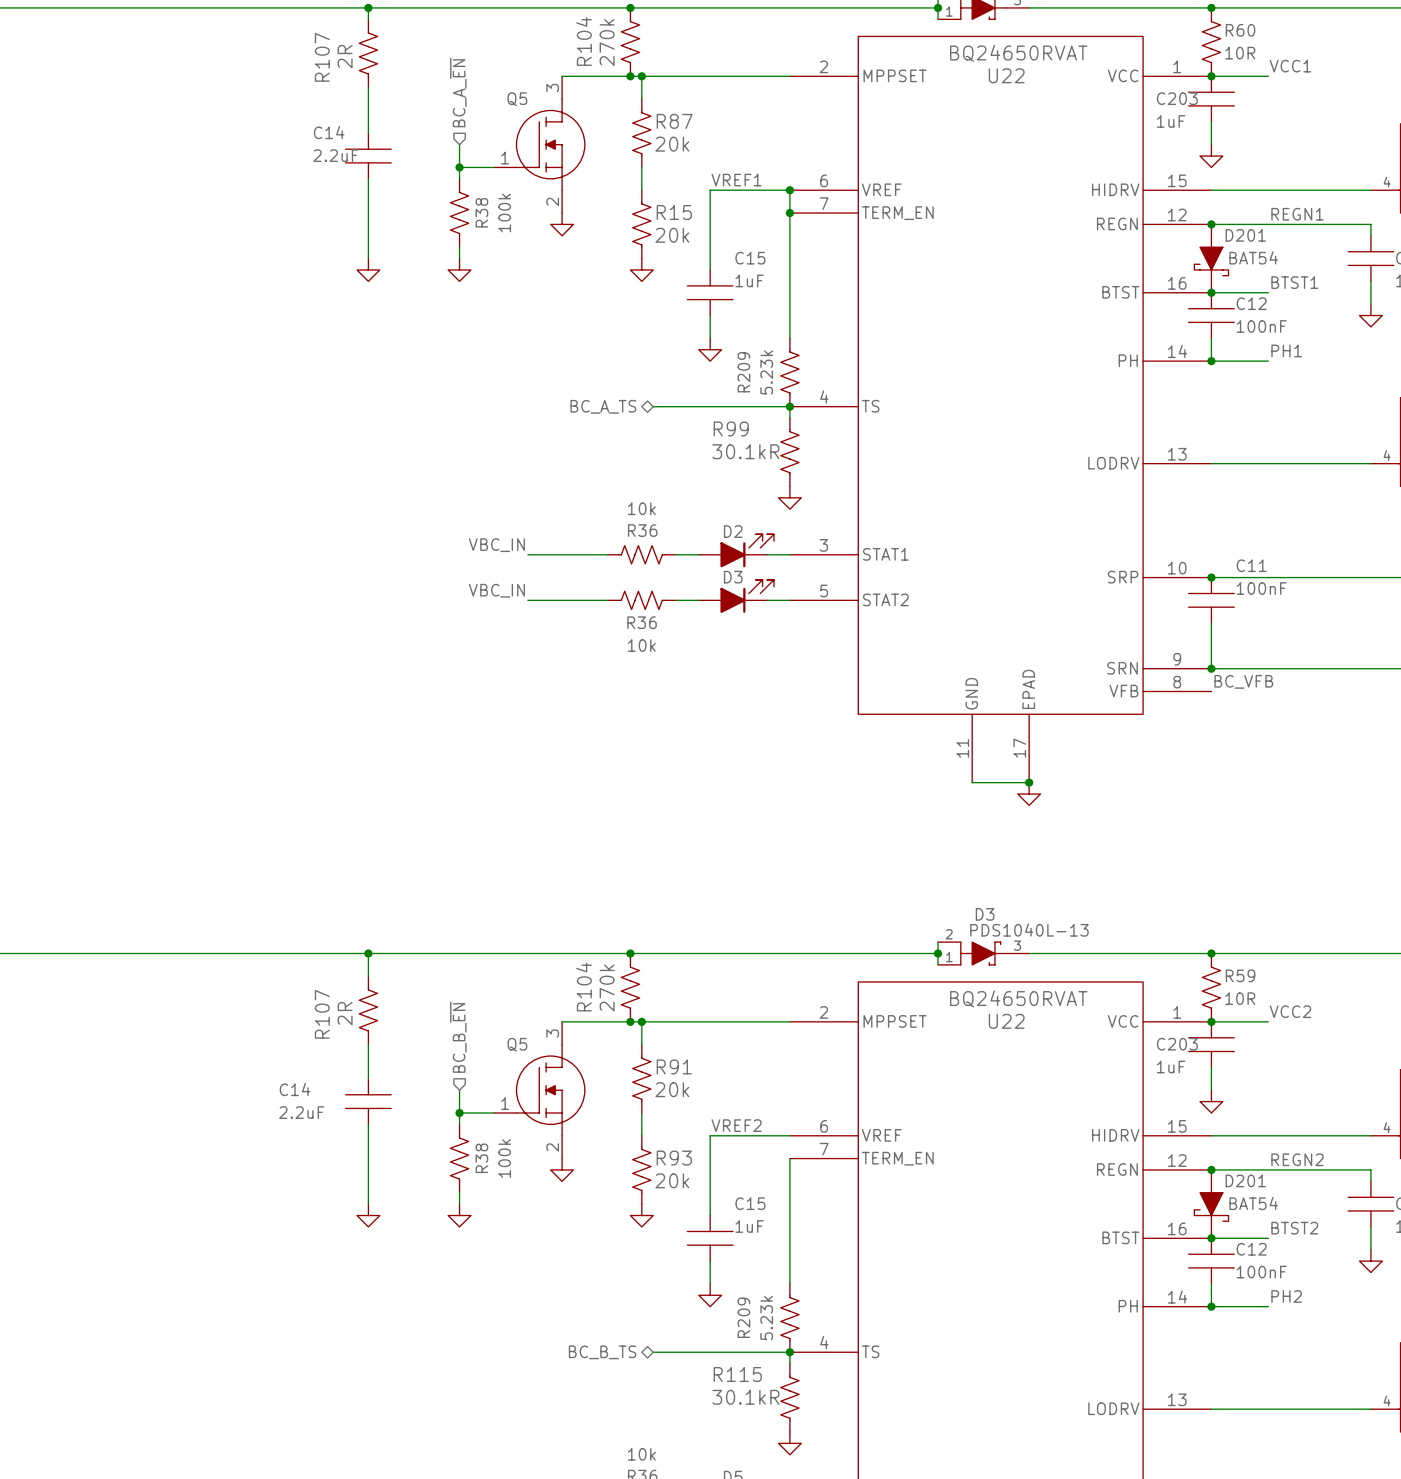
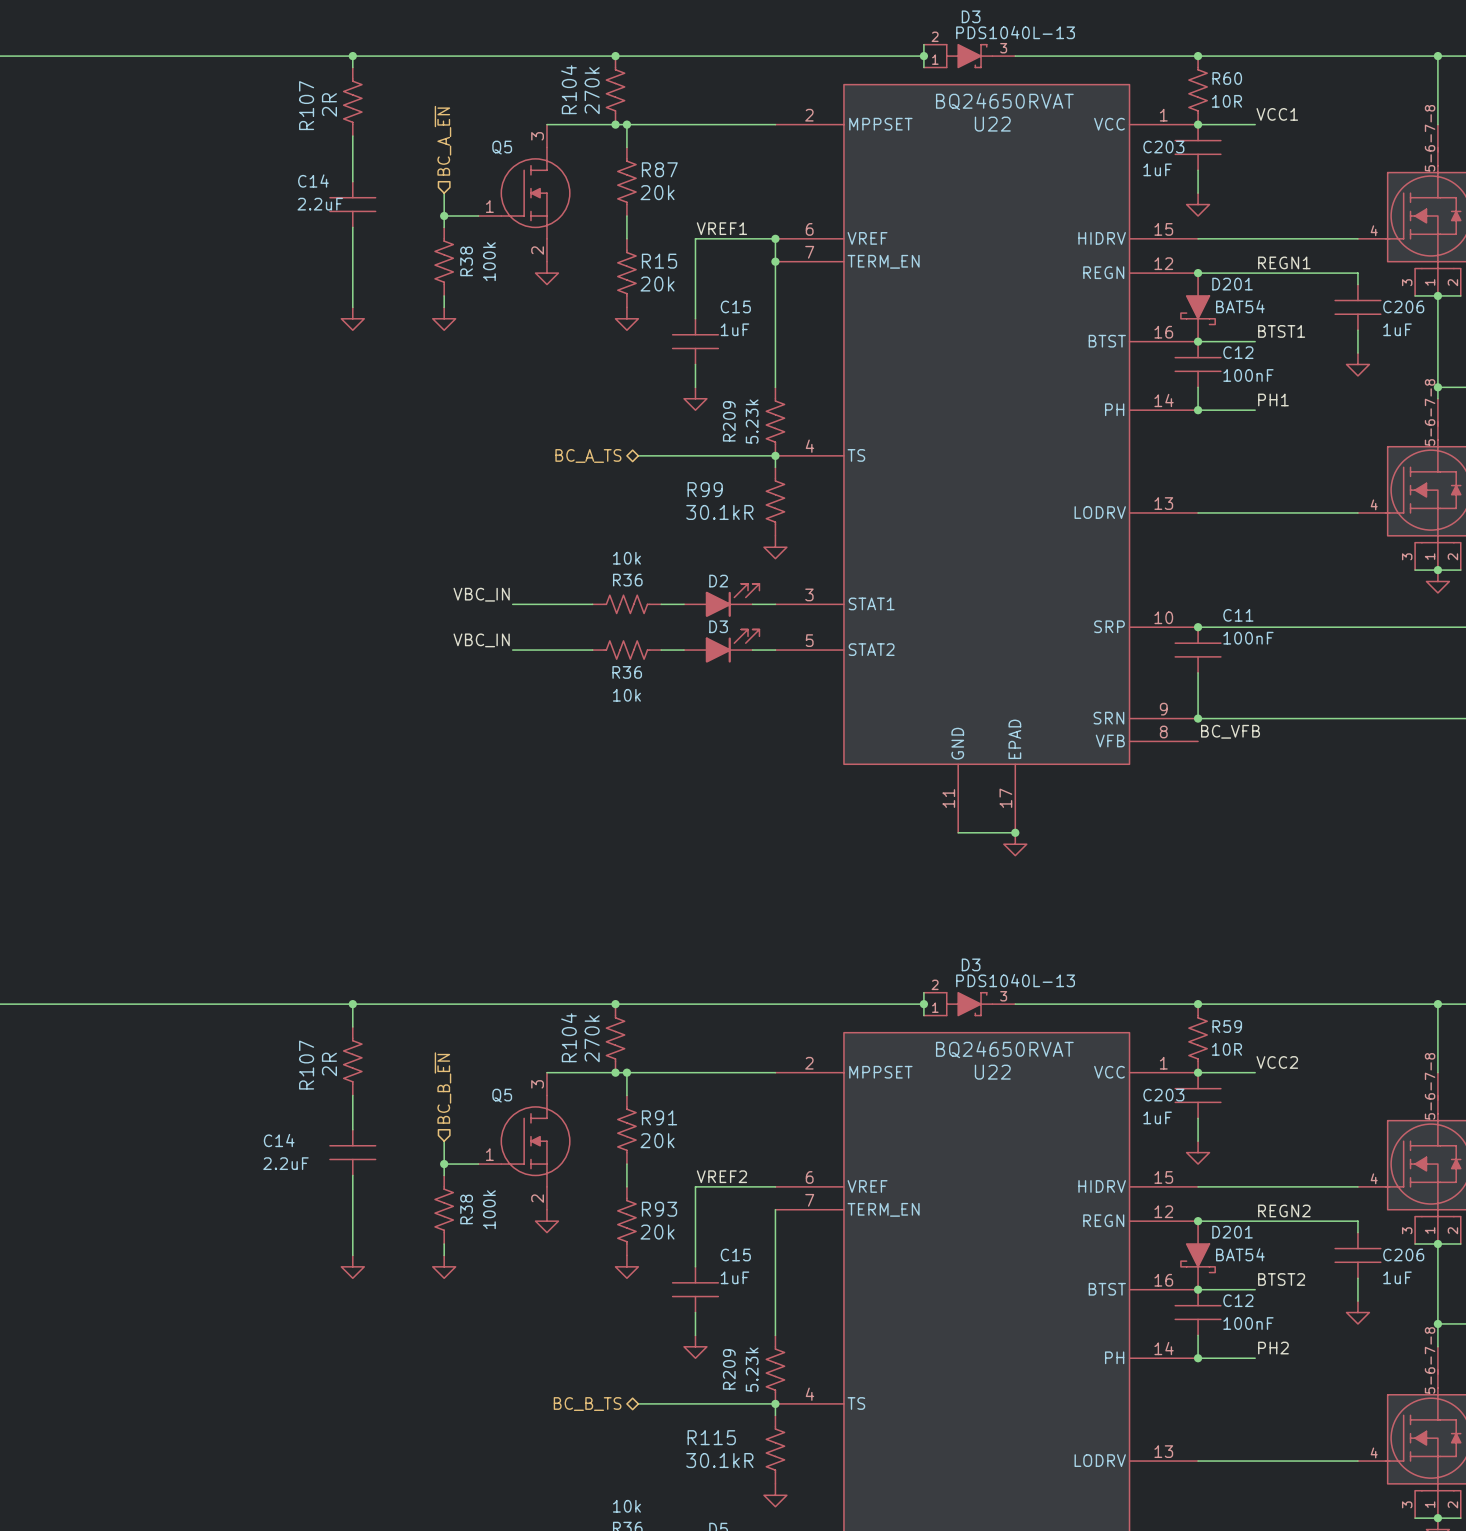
R99 name position: R99 (731, 428) -> R99 (705, 489)
R99 value position: 30.1kR (745, 451) -> 30.1kR (719, 512)
R115 name position: R115 (737, 1374) -> R115 (711, 1437)
R115 value position: 30.1kR (745, 1397) -> 30.1kR (719, 1460)

